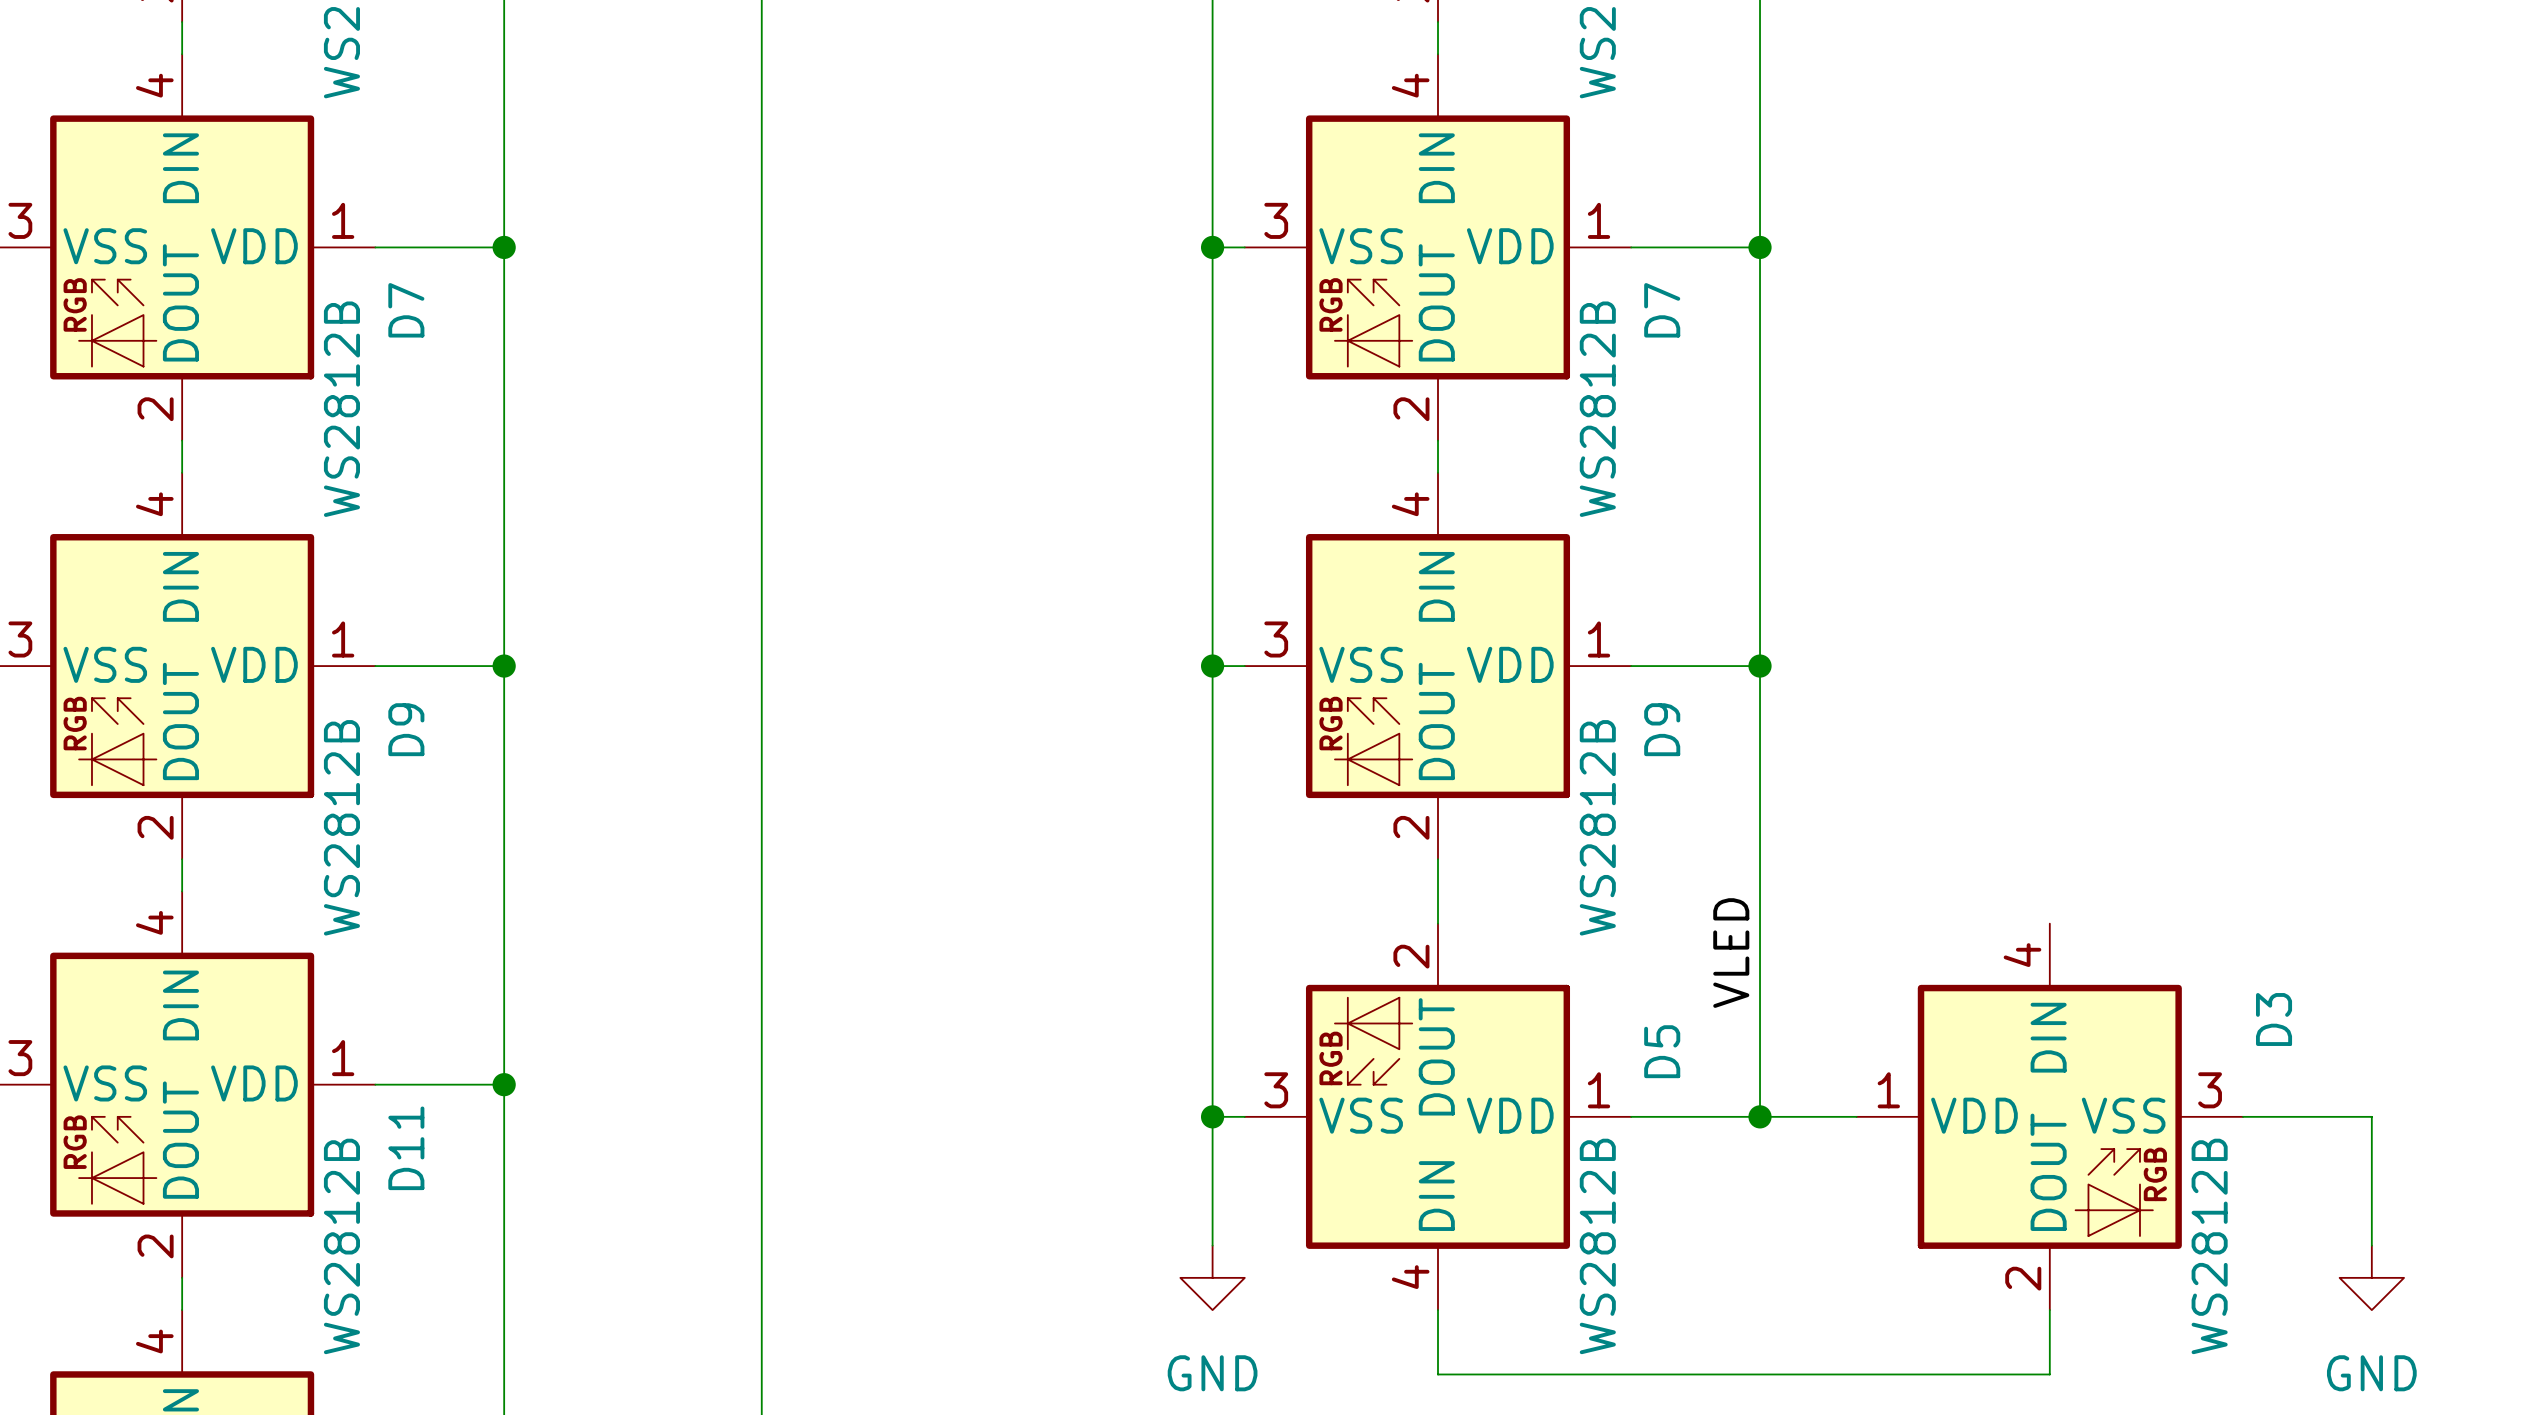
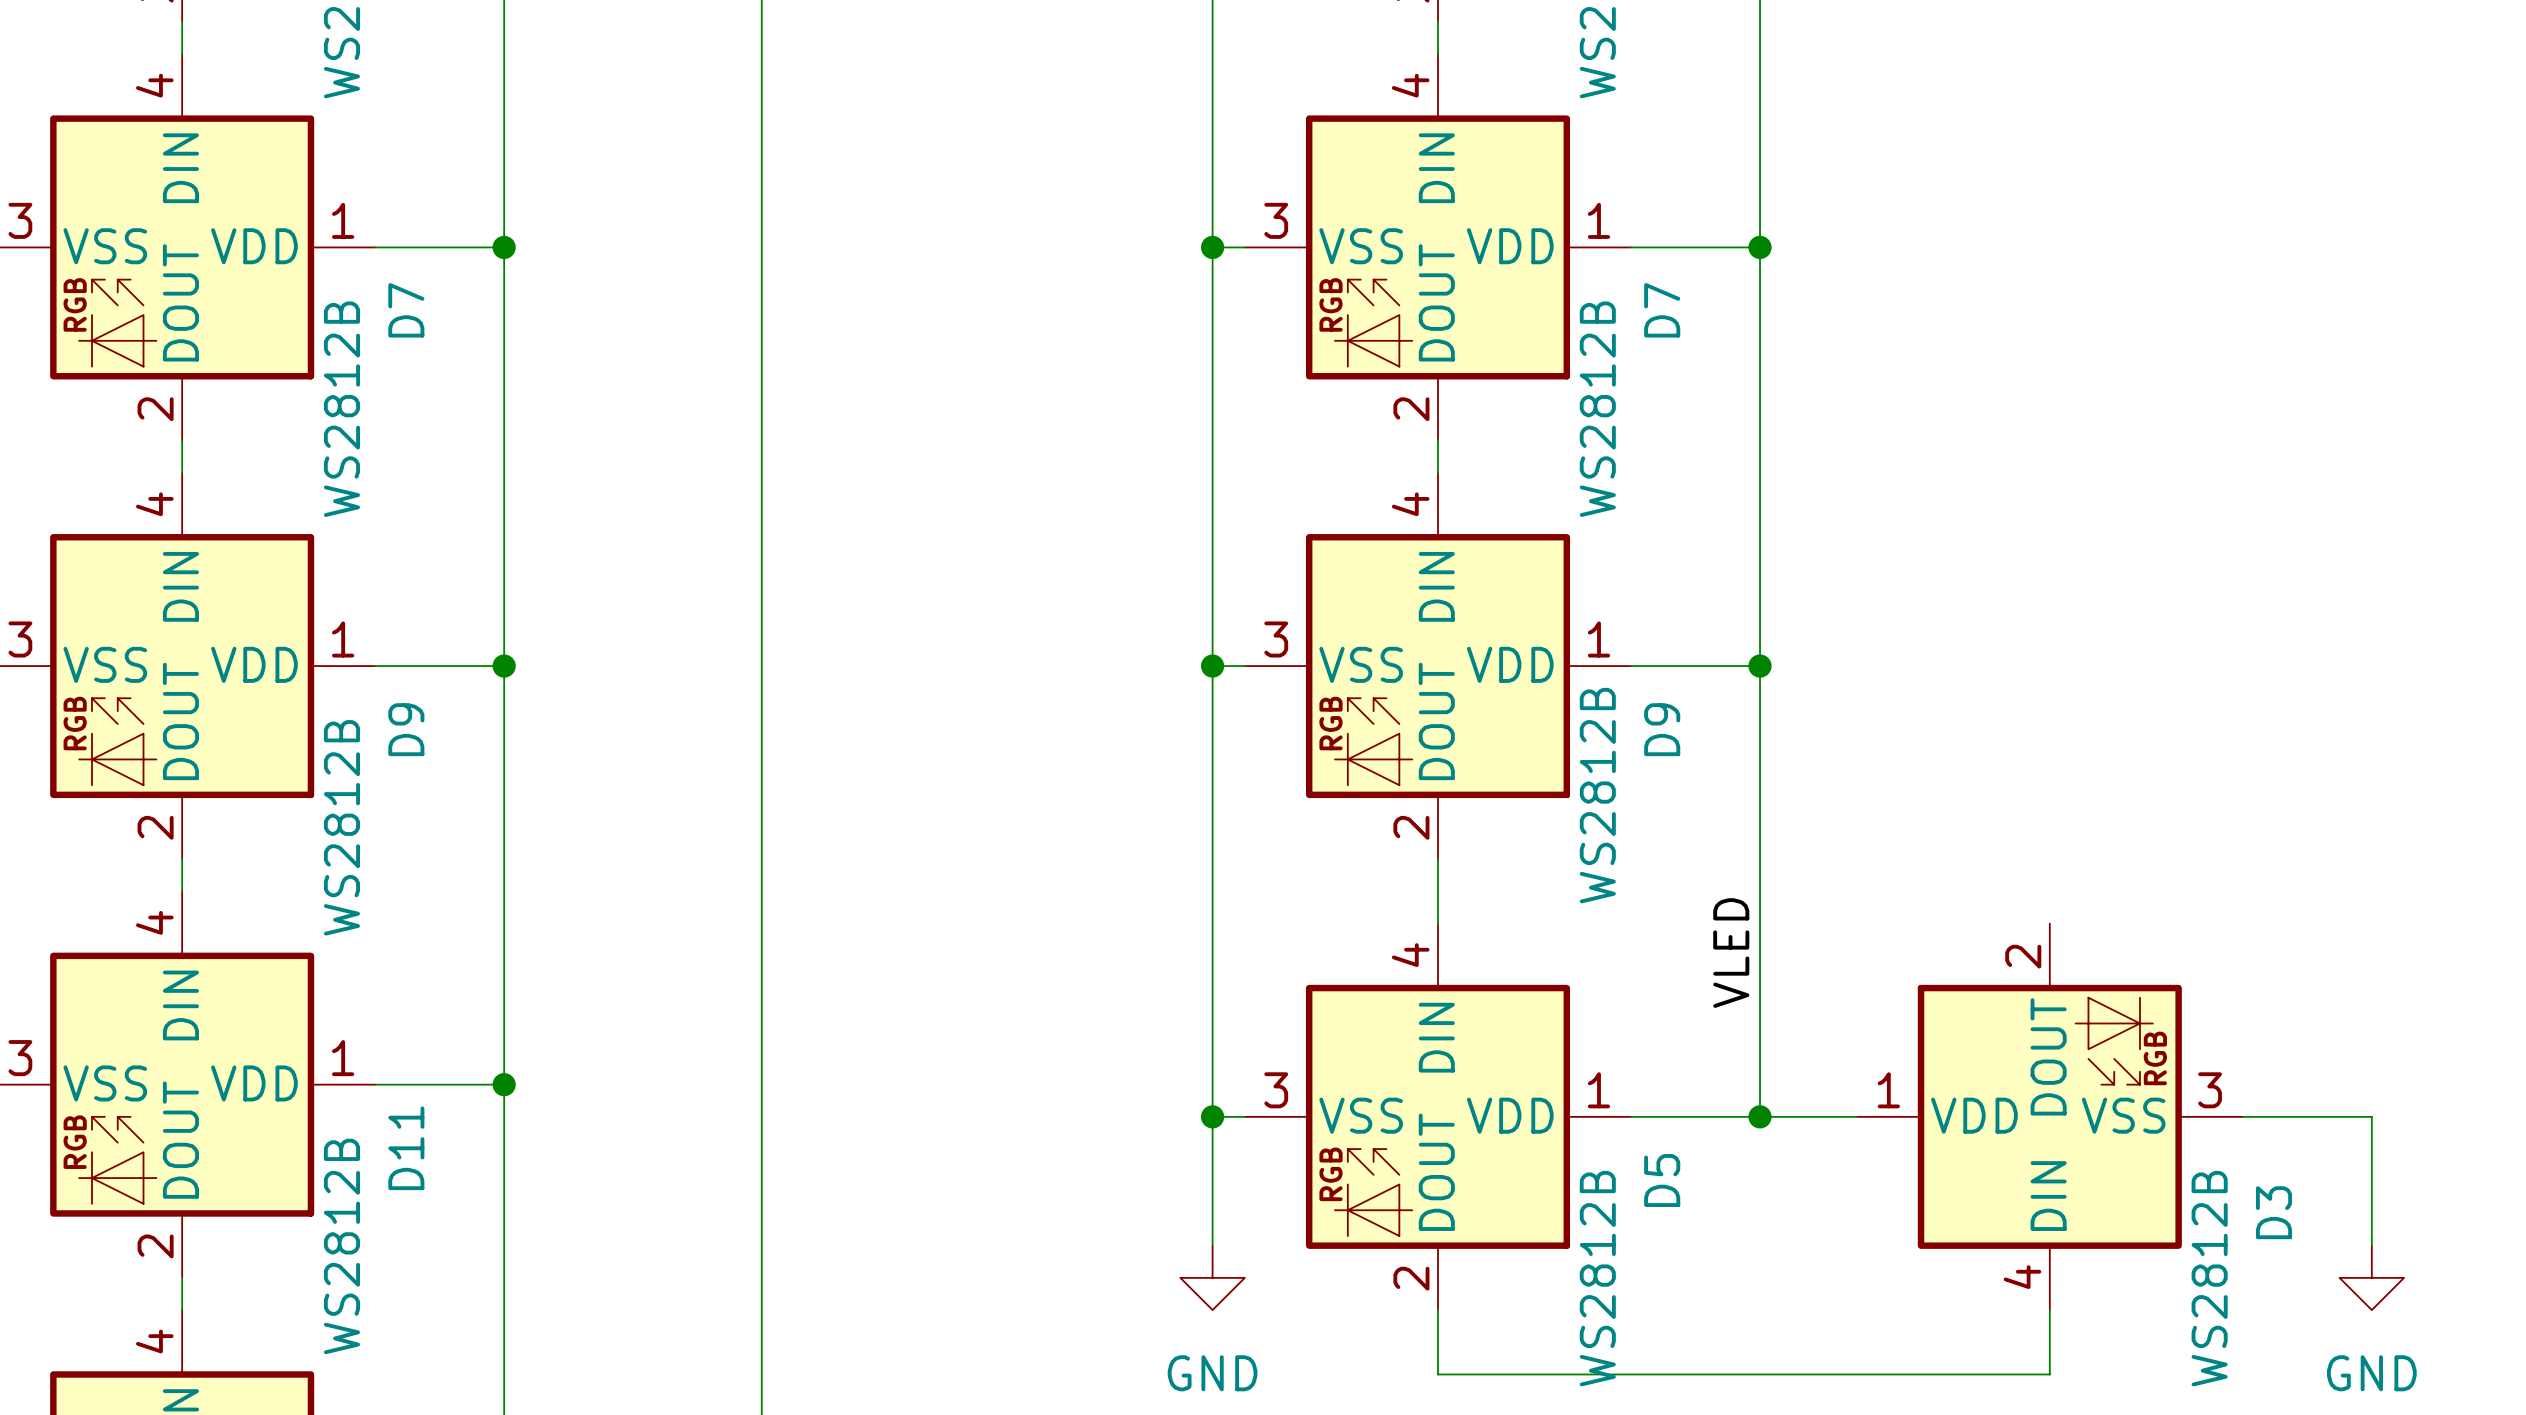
D9 value position: WS2812B (1597, 827) -> WS2812B (1597, 795)
D5 flip: as is (1437, 1116) -> up-down (1437, 1116)
D3 flip: as is (2049, 1116) -> up-down (2049, 1116)

